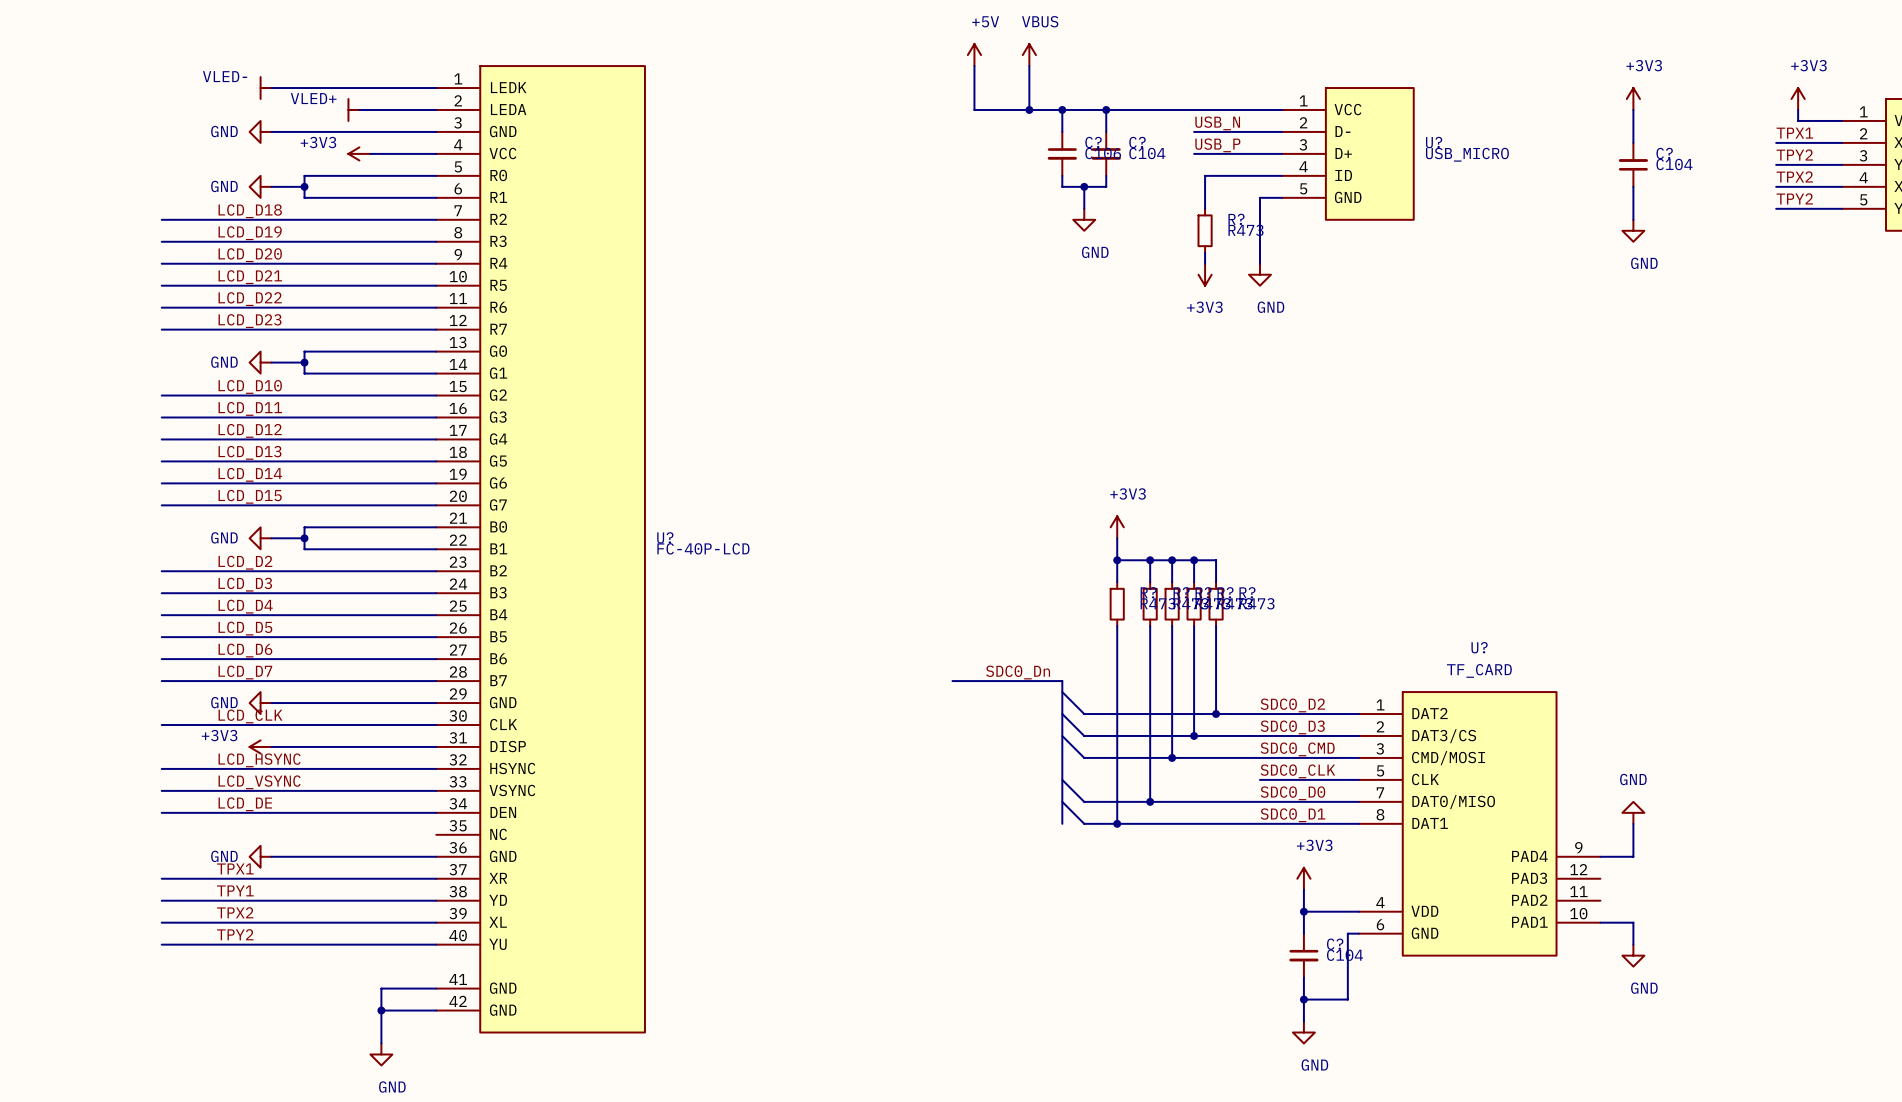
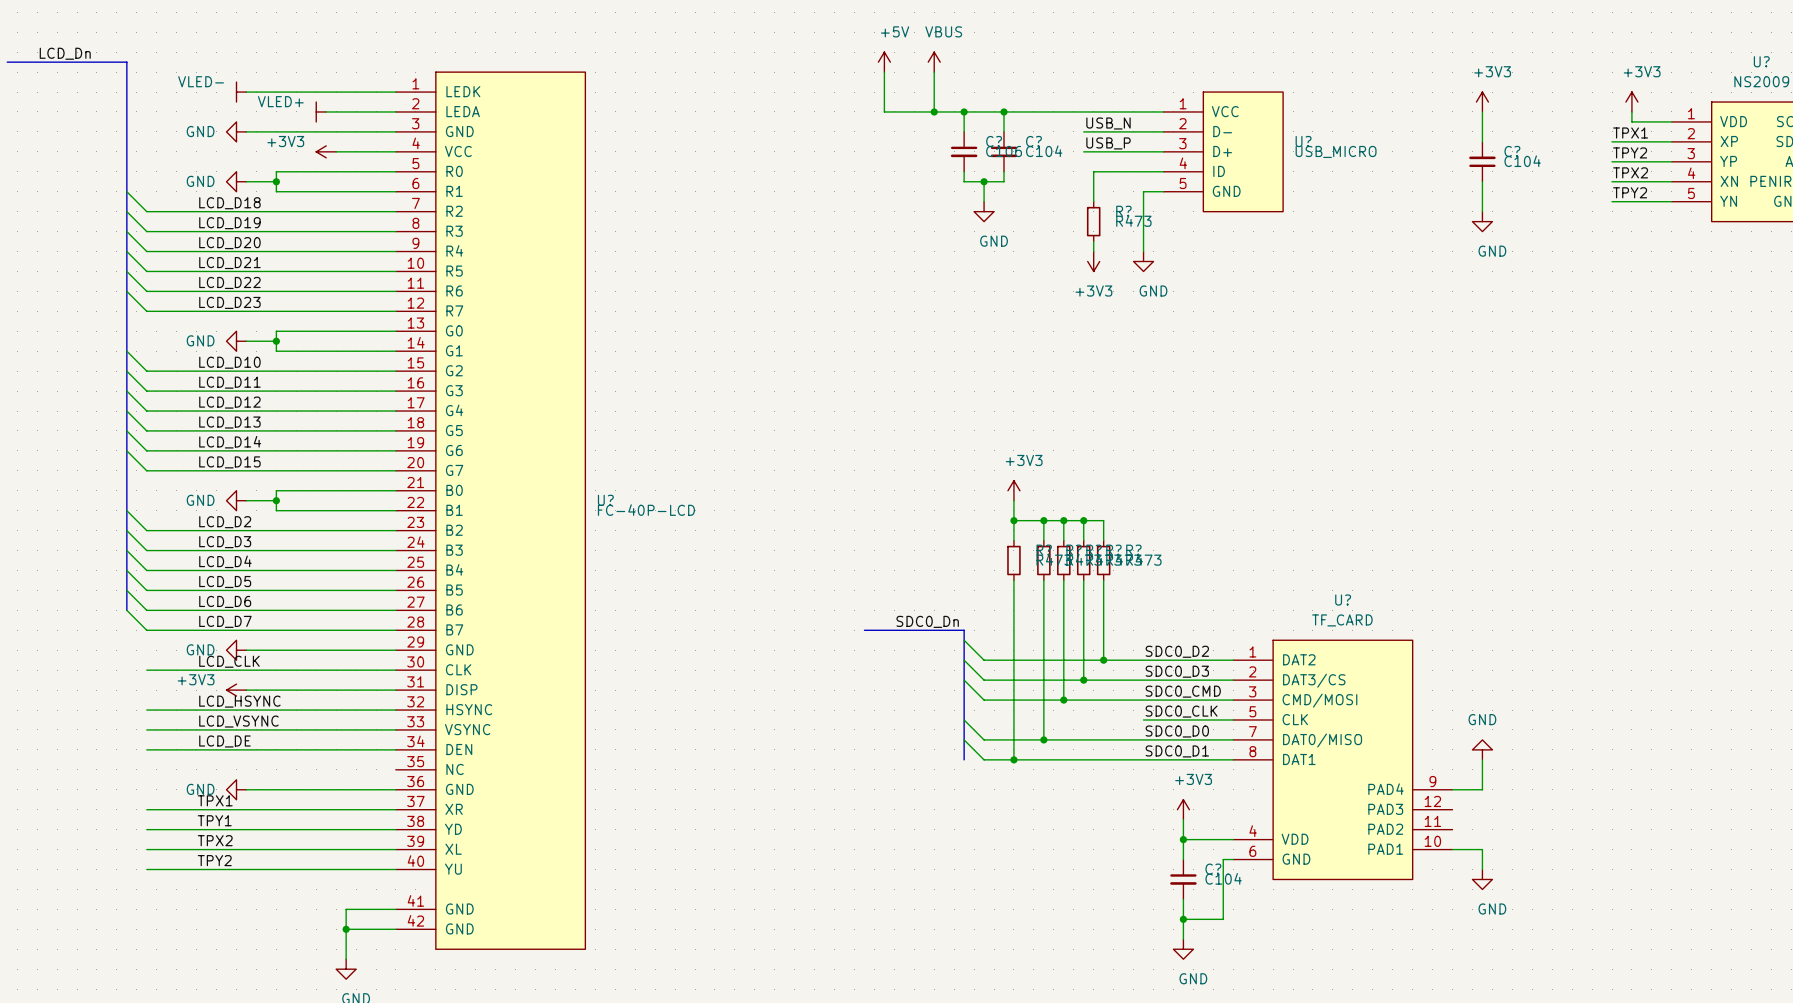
label: none -> LCD_Dn (65, 53)
bus: none -> (7, 62) (126, 62) (126, 610)
wire: none -> (126, 191) (146, 211)
wire: none -> (126, 211) (146, 231)
wire: none -> (126, 231) (146, 251)
wire: none -> (126, 251) (146, 271)
wire: none -> (126, 271) (146, 291)
wire: none -> (126, 291) (146, 311)
wire: none -> (126, 351) (146, 371)
wire: none -> (126, 371) (146, 391)
wire: none -> (126, 391) (146, 411)
wire: none -> (126, 411) (146, 430)
wire: none -> (126, 430) (146, 450)
wire: none -> (126, 450) (146, 470)
wire: none -> (126, 510) (146, 530)
wire: none -> (126, 530) (146, 550)
wire: none -> (126, 550) (146, 570)
wire: none -> (126, 570) (146, 590)
wire: none -> (126, 590) (146, 610)
wire: none -> (126, 610) (146, 630)

